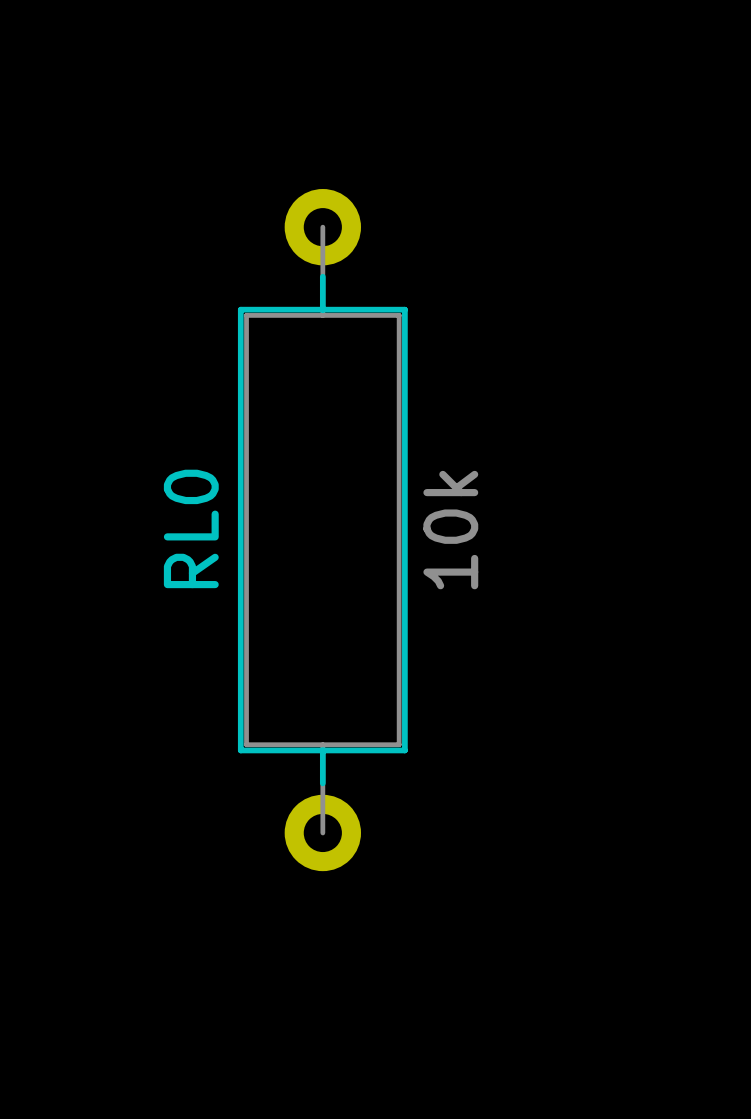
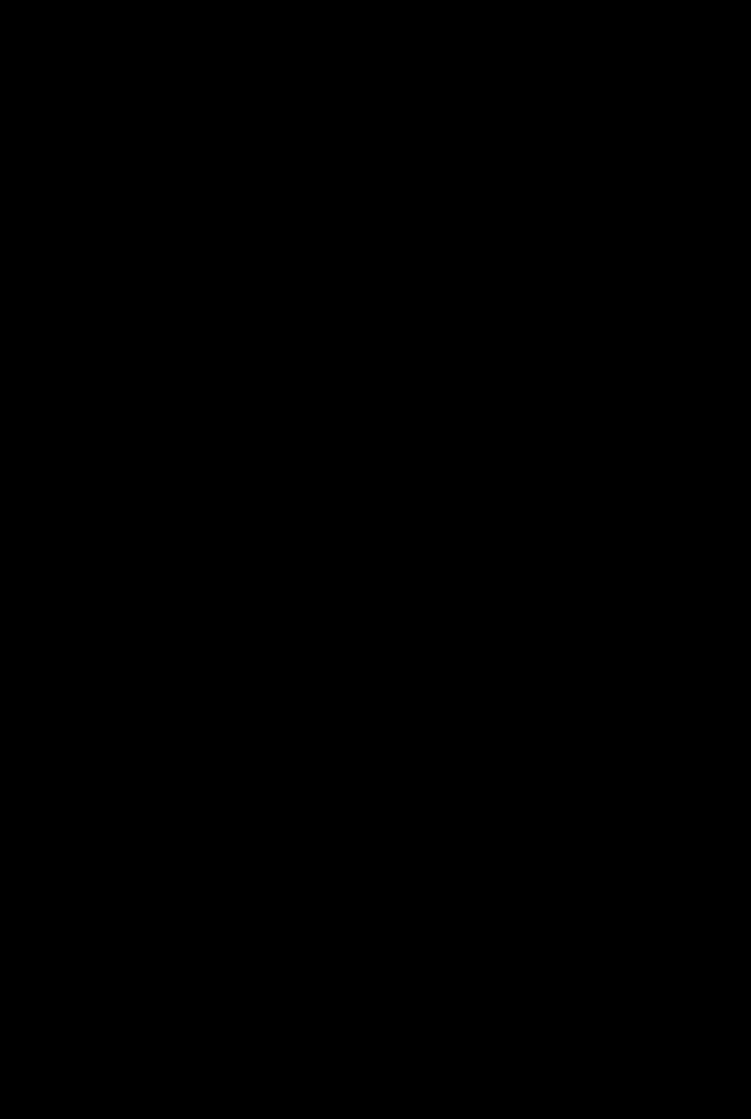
RL0: 10k (322, 530) -> none

